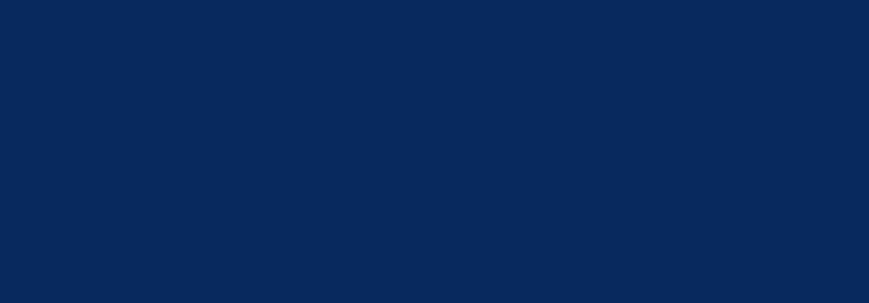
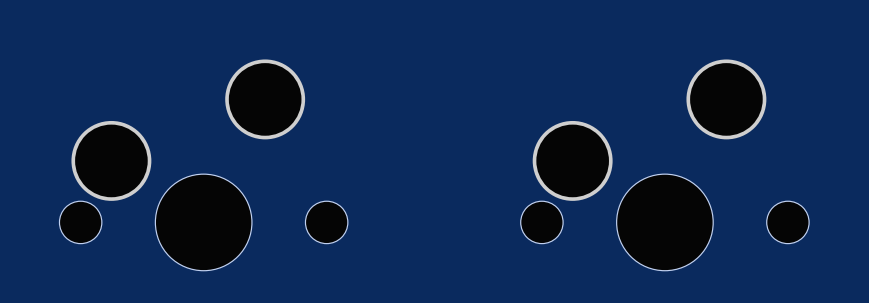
part: none -> (203, 165)
part: none -> (664, 165)

